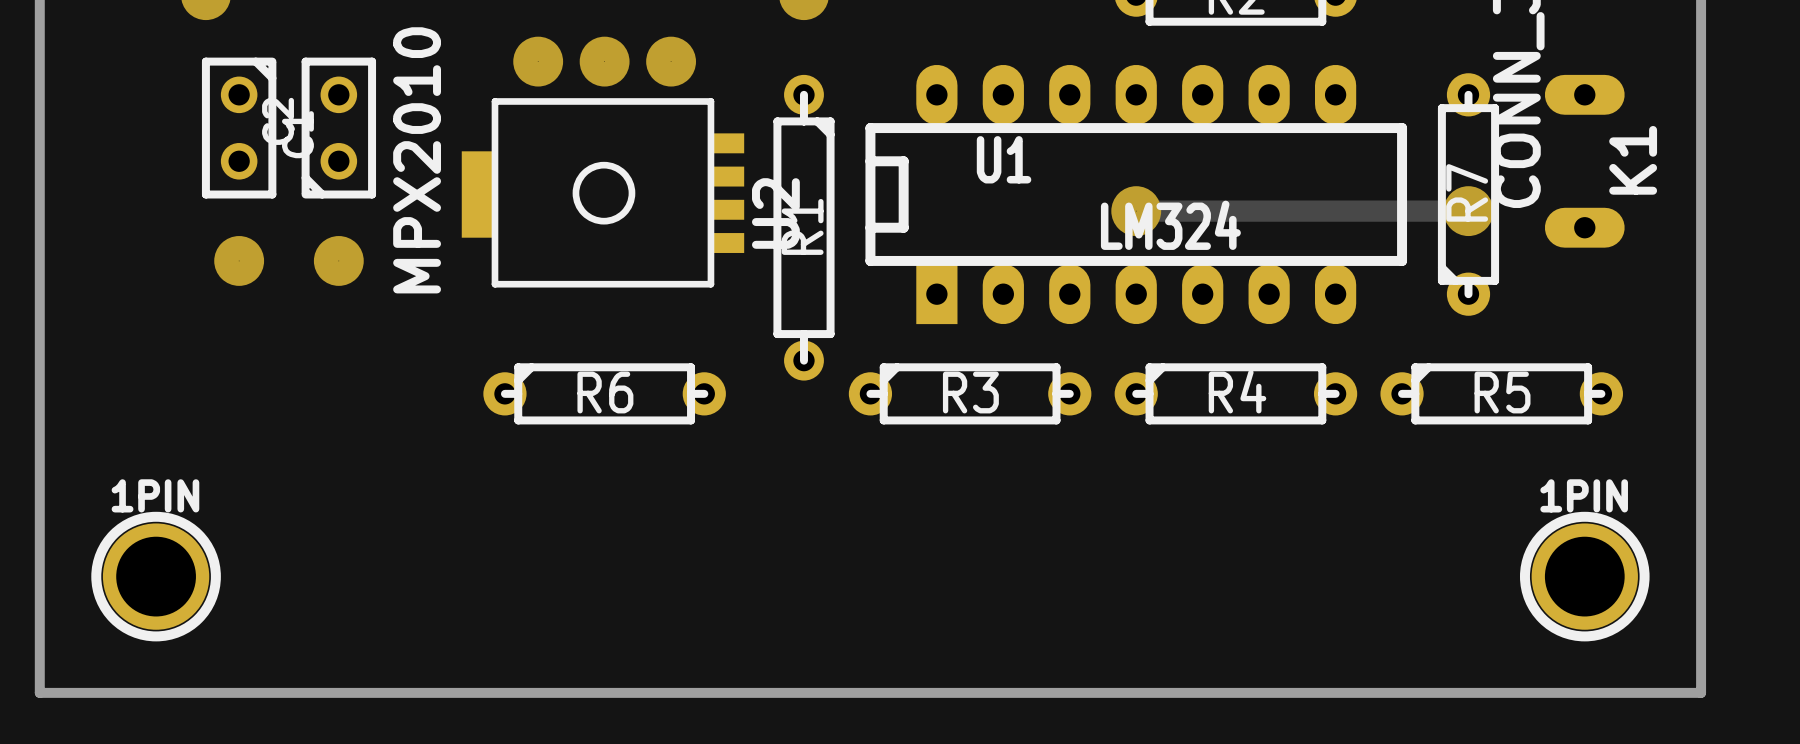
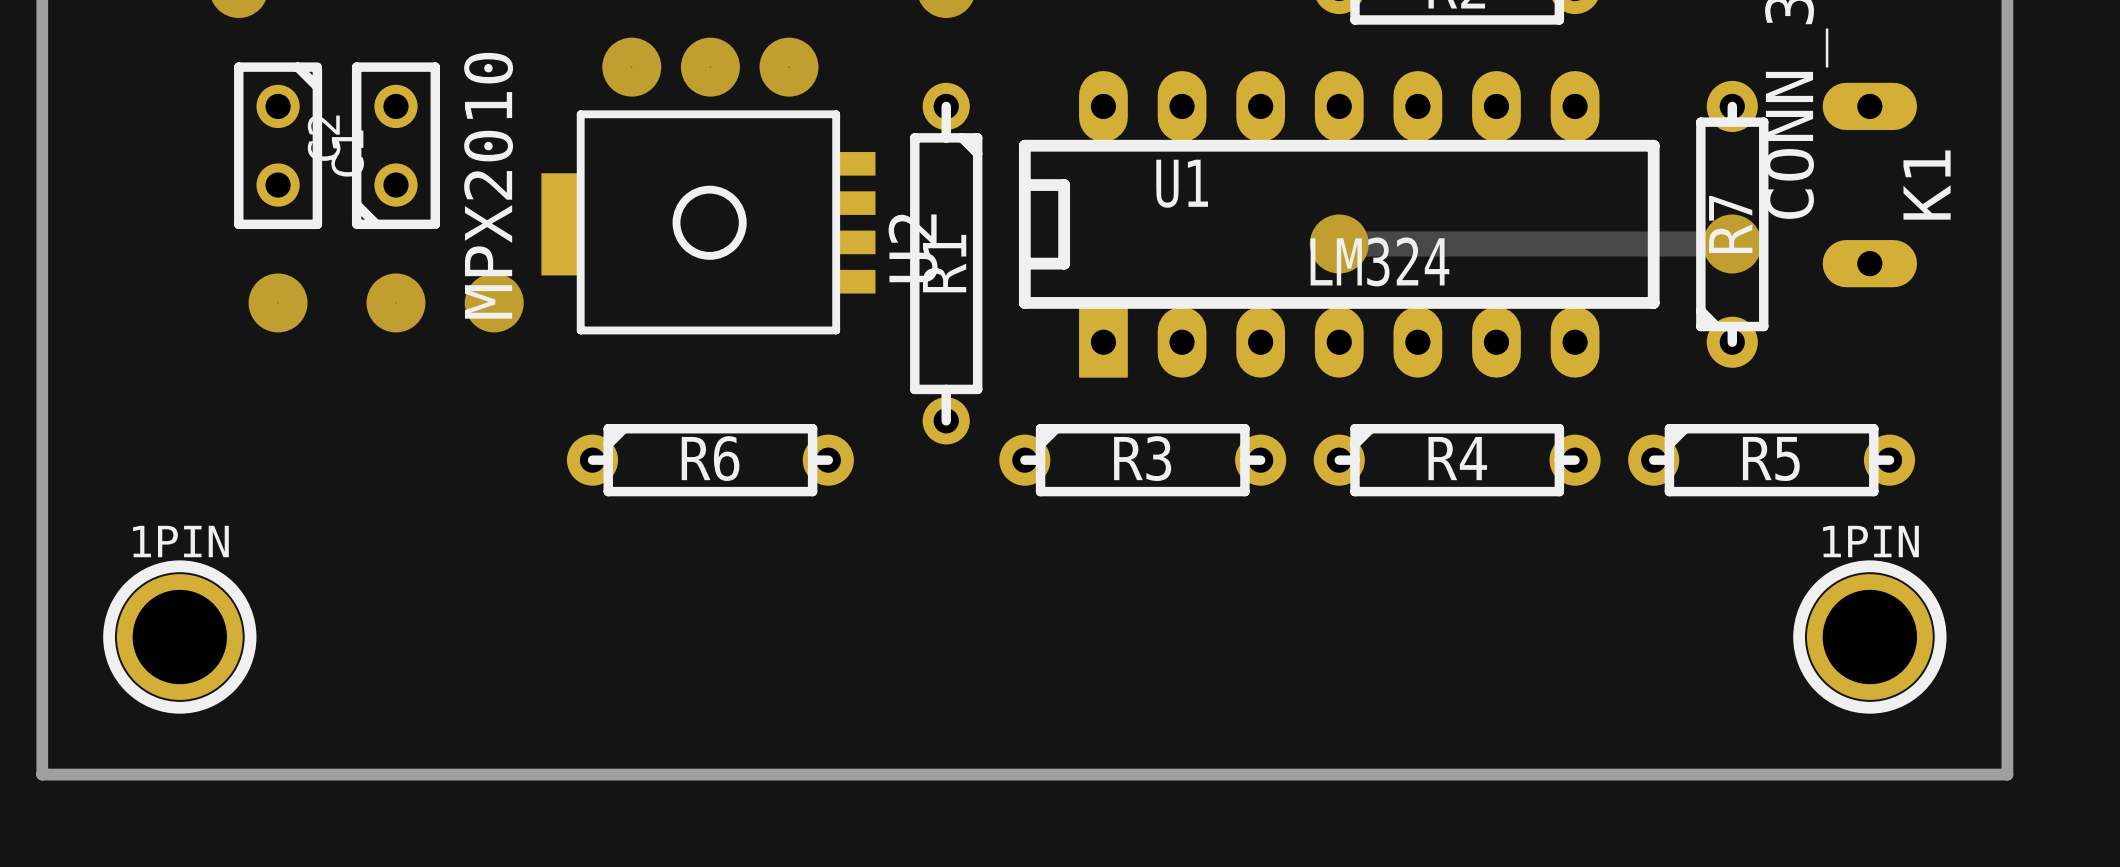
via: none -> (494, 302)
1PIN position: (156, 576) -> (179, 637)
1PIN position: (1584, 576) -> (1869, 637)
board edge: (39, 659) (39, 692) (1701, 692) (1701, 659) -> (42, 774) (2007, 774)

